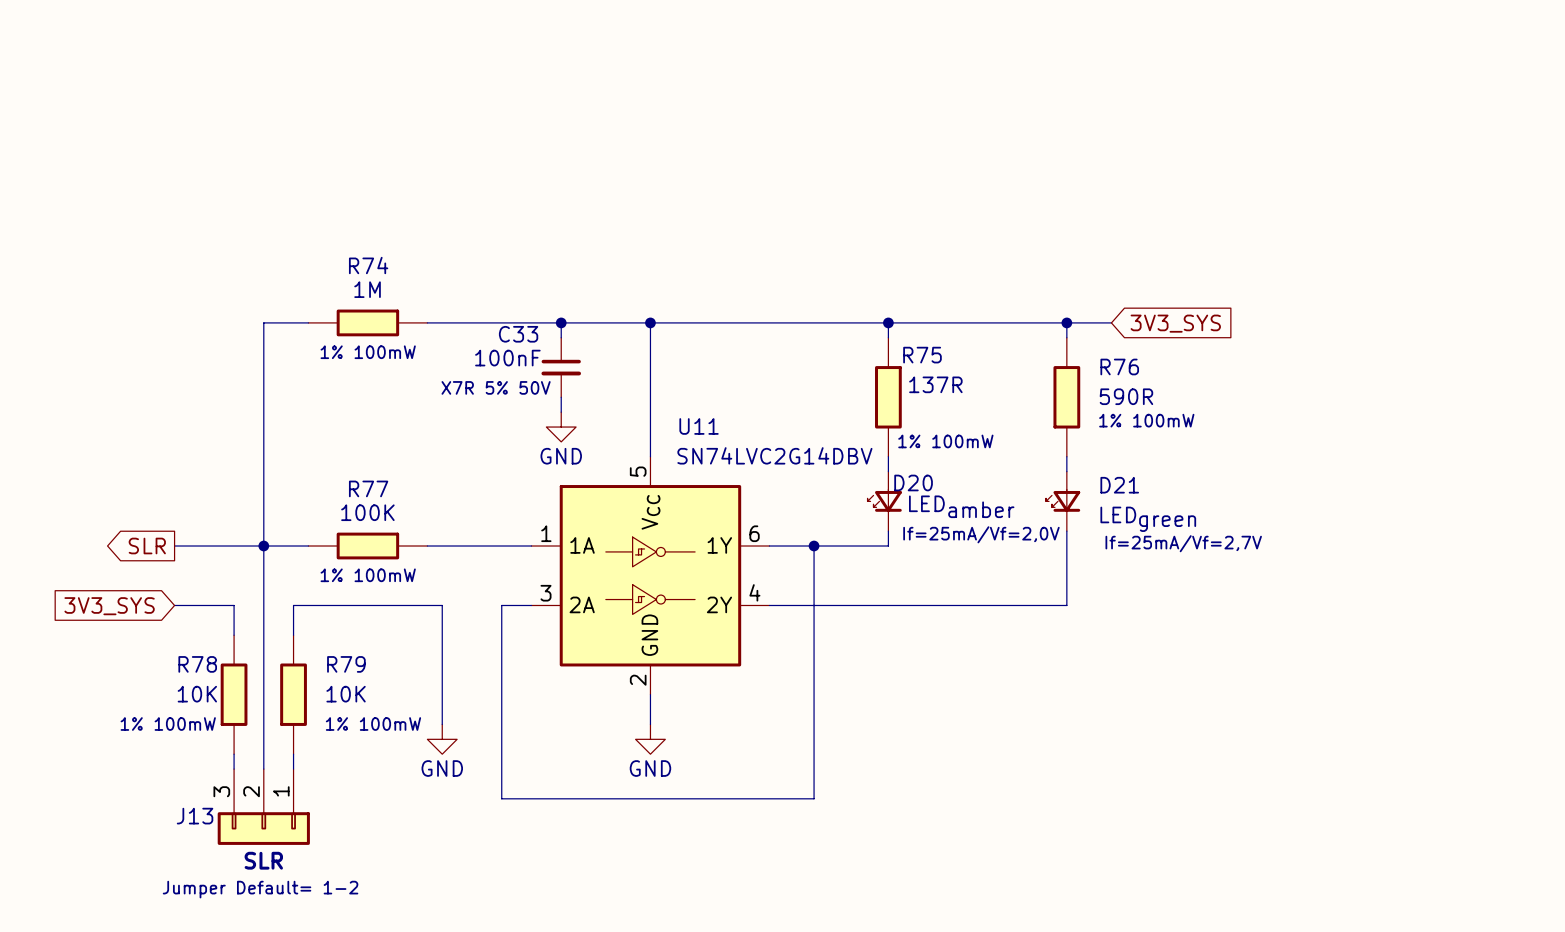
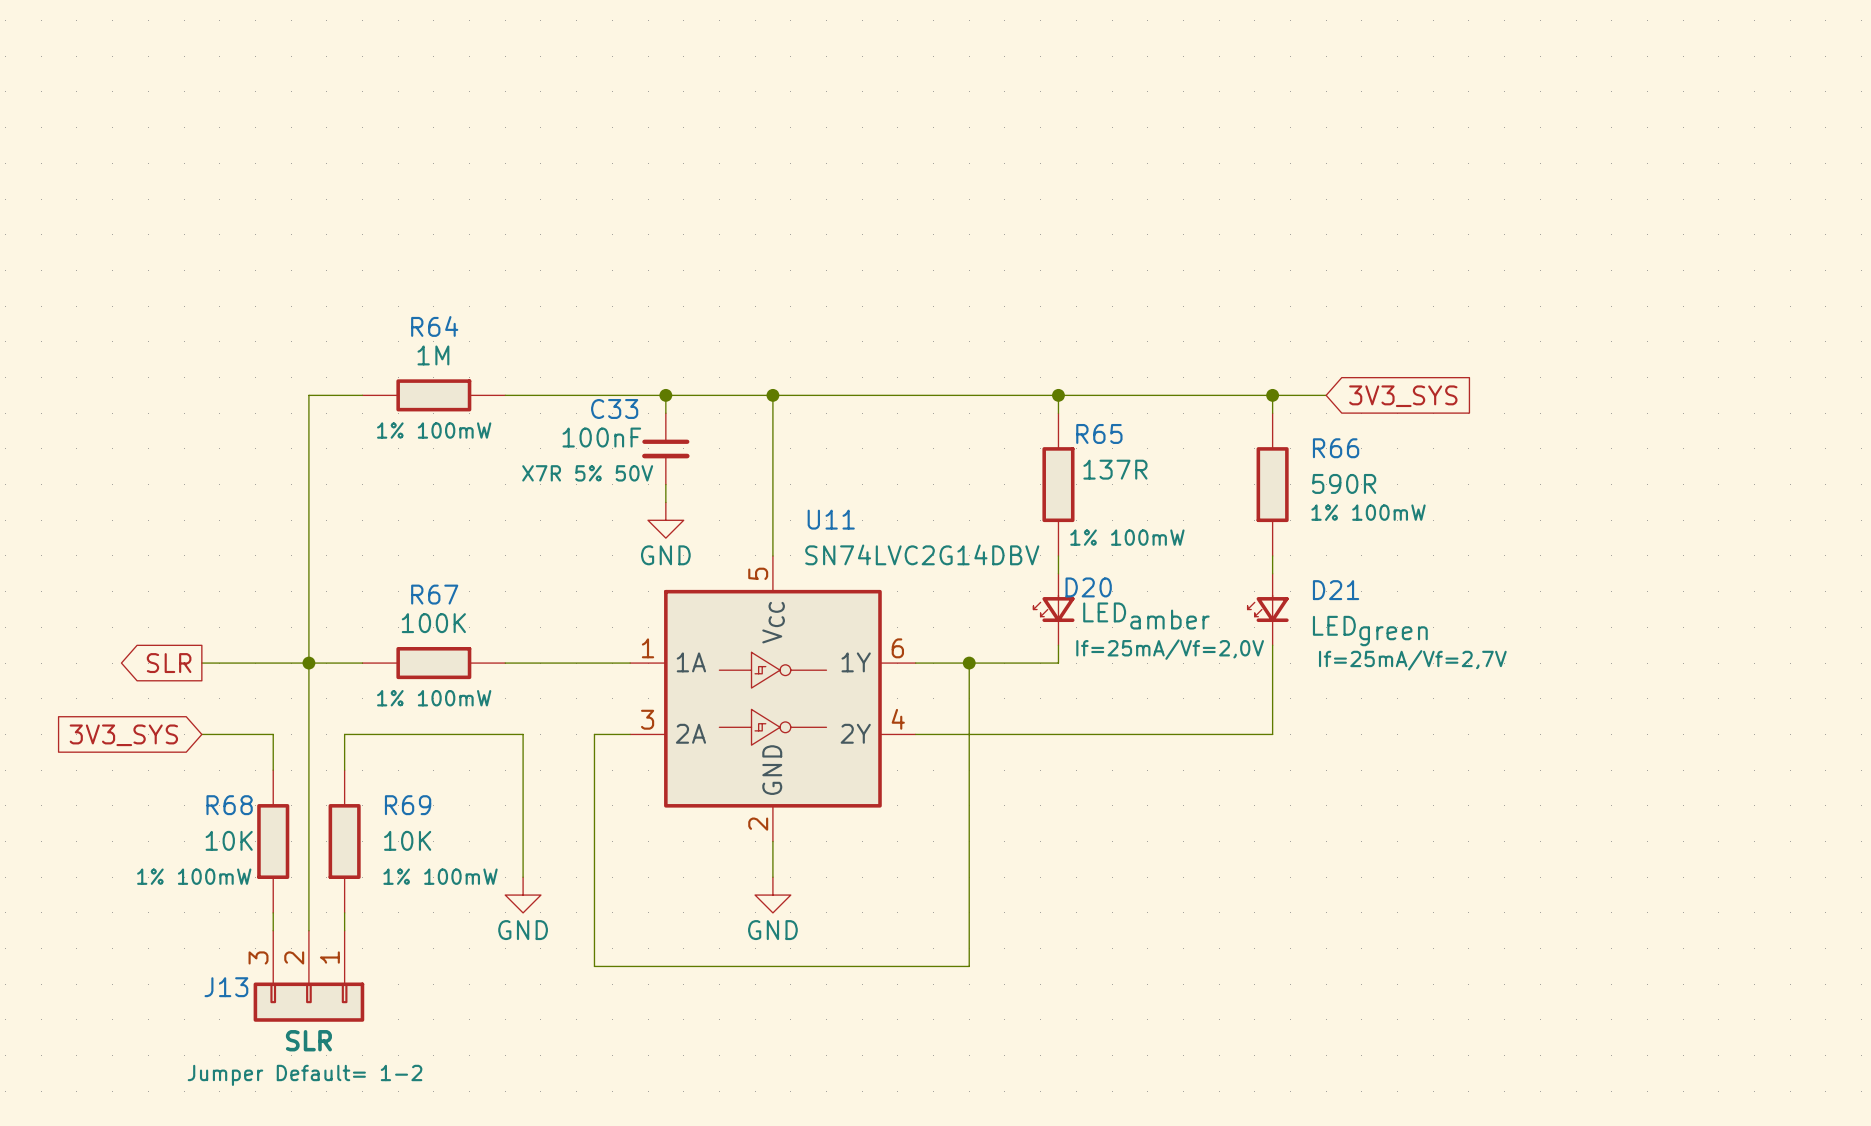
R74 name: R74 (368, 265) -> R64 (434, 326)
R75 name: R75 (922, 355) -> R65 (1099, 433)
R76 name: R76 (1119, 366) -> R66 (1336, 448)
R77 name: R77 (368, 488) -> R67 (434, 594)
R78 name: R78 (197, 664) -> R68 (229, 805)
R79 name: R79 (346, 664) -> R69 (408, 805)

